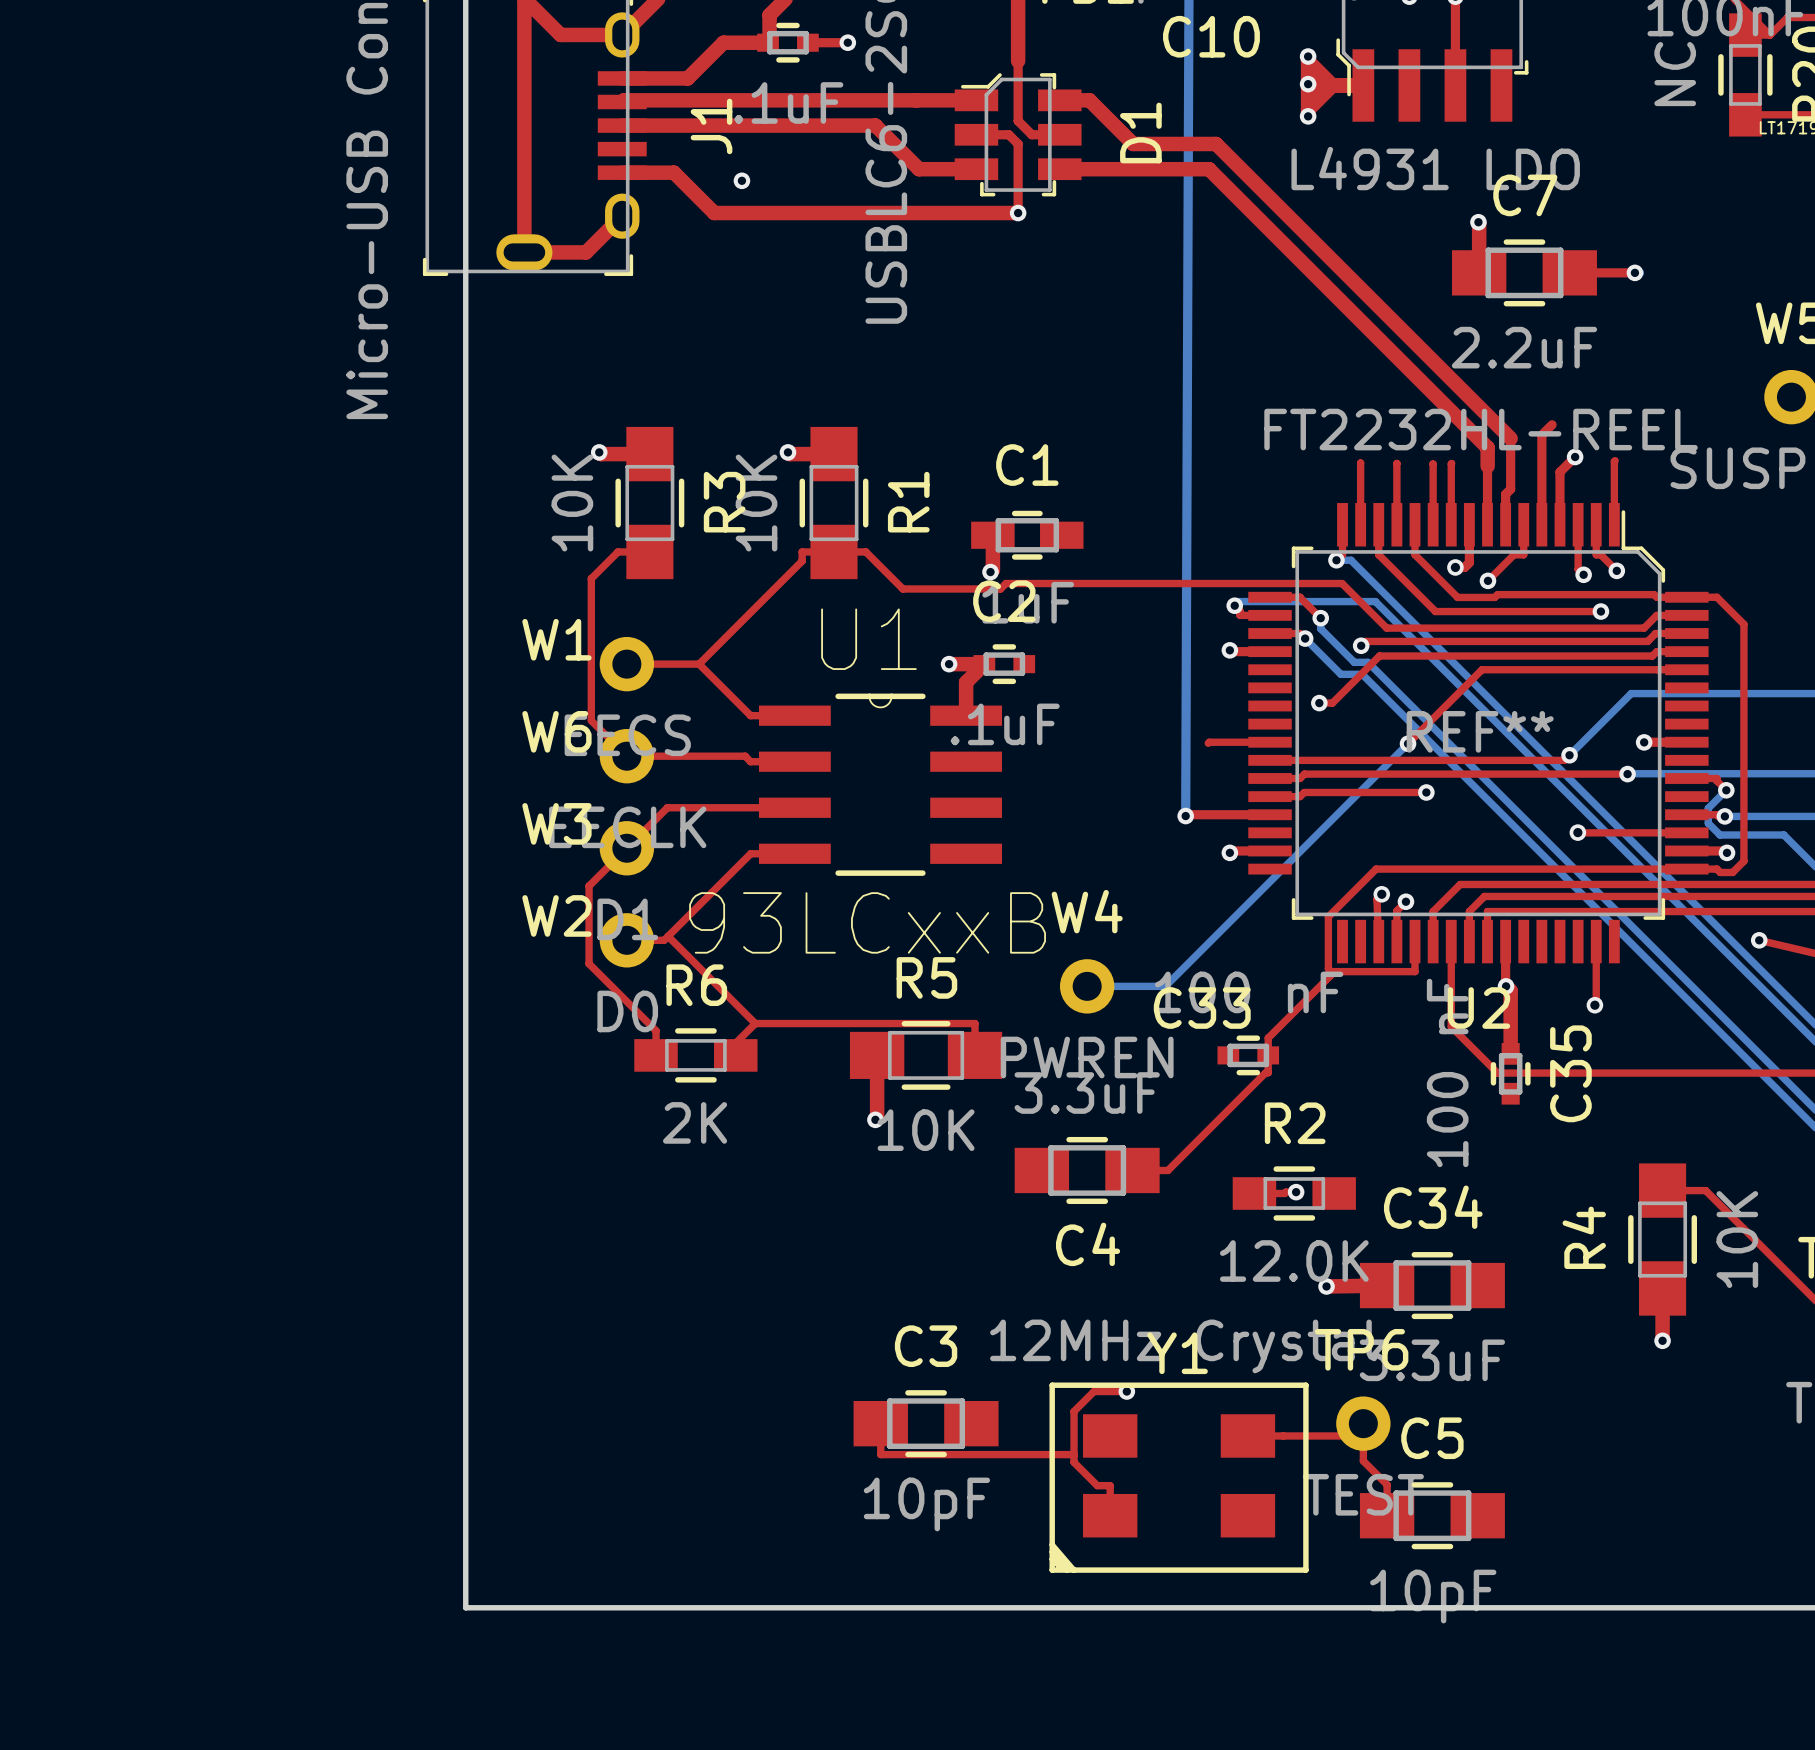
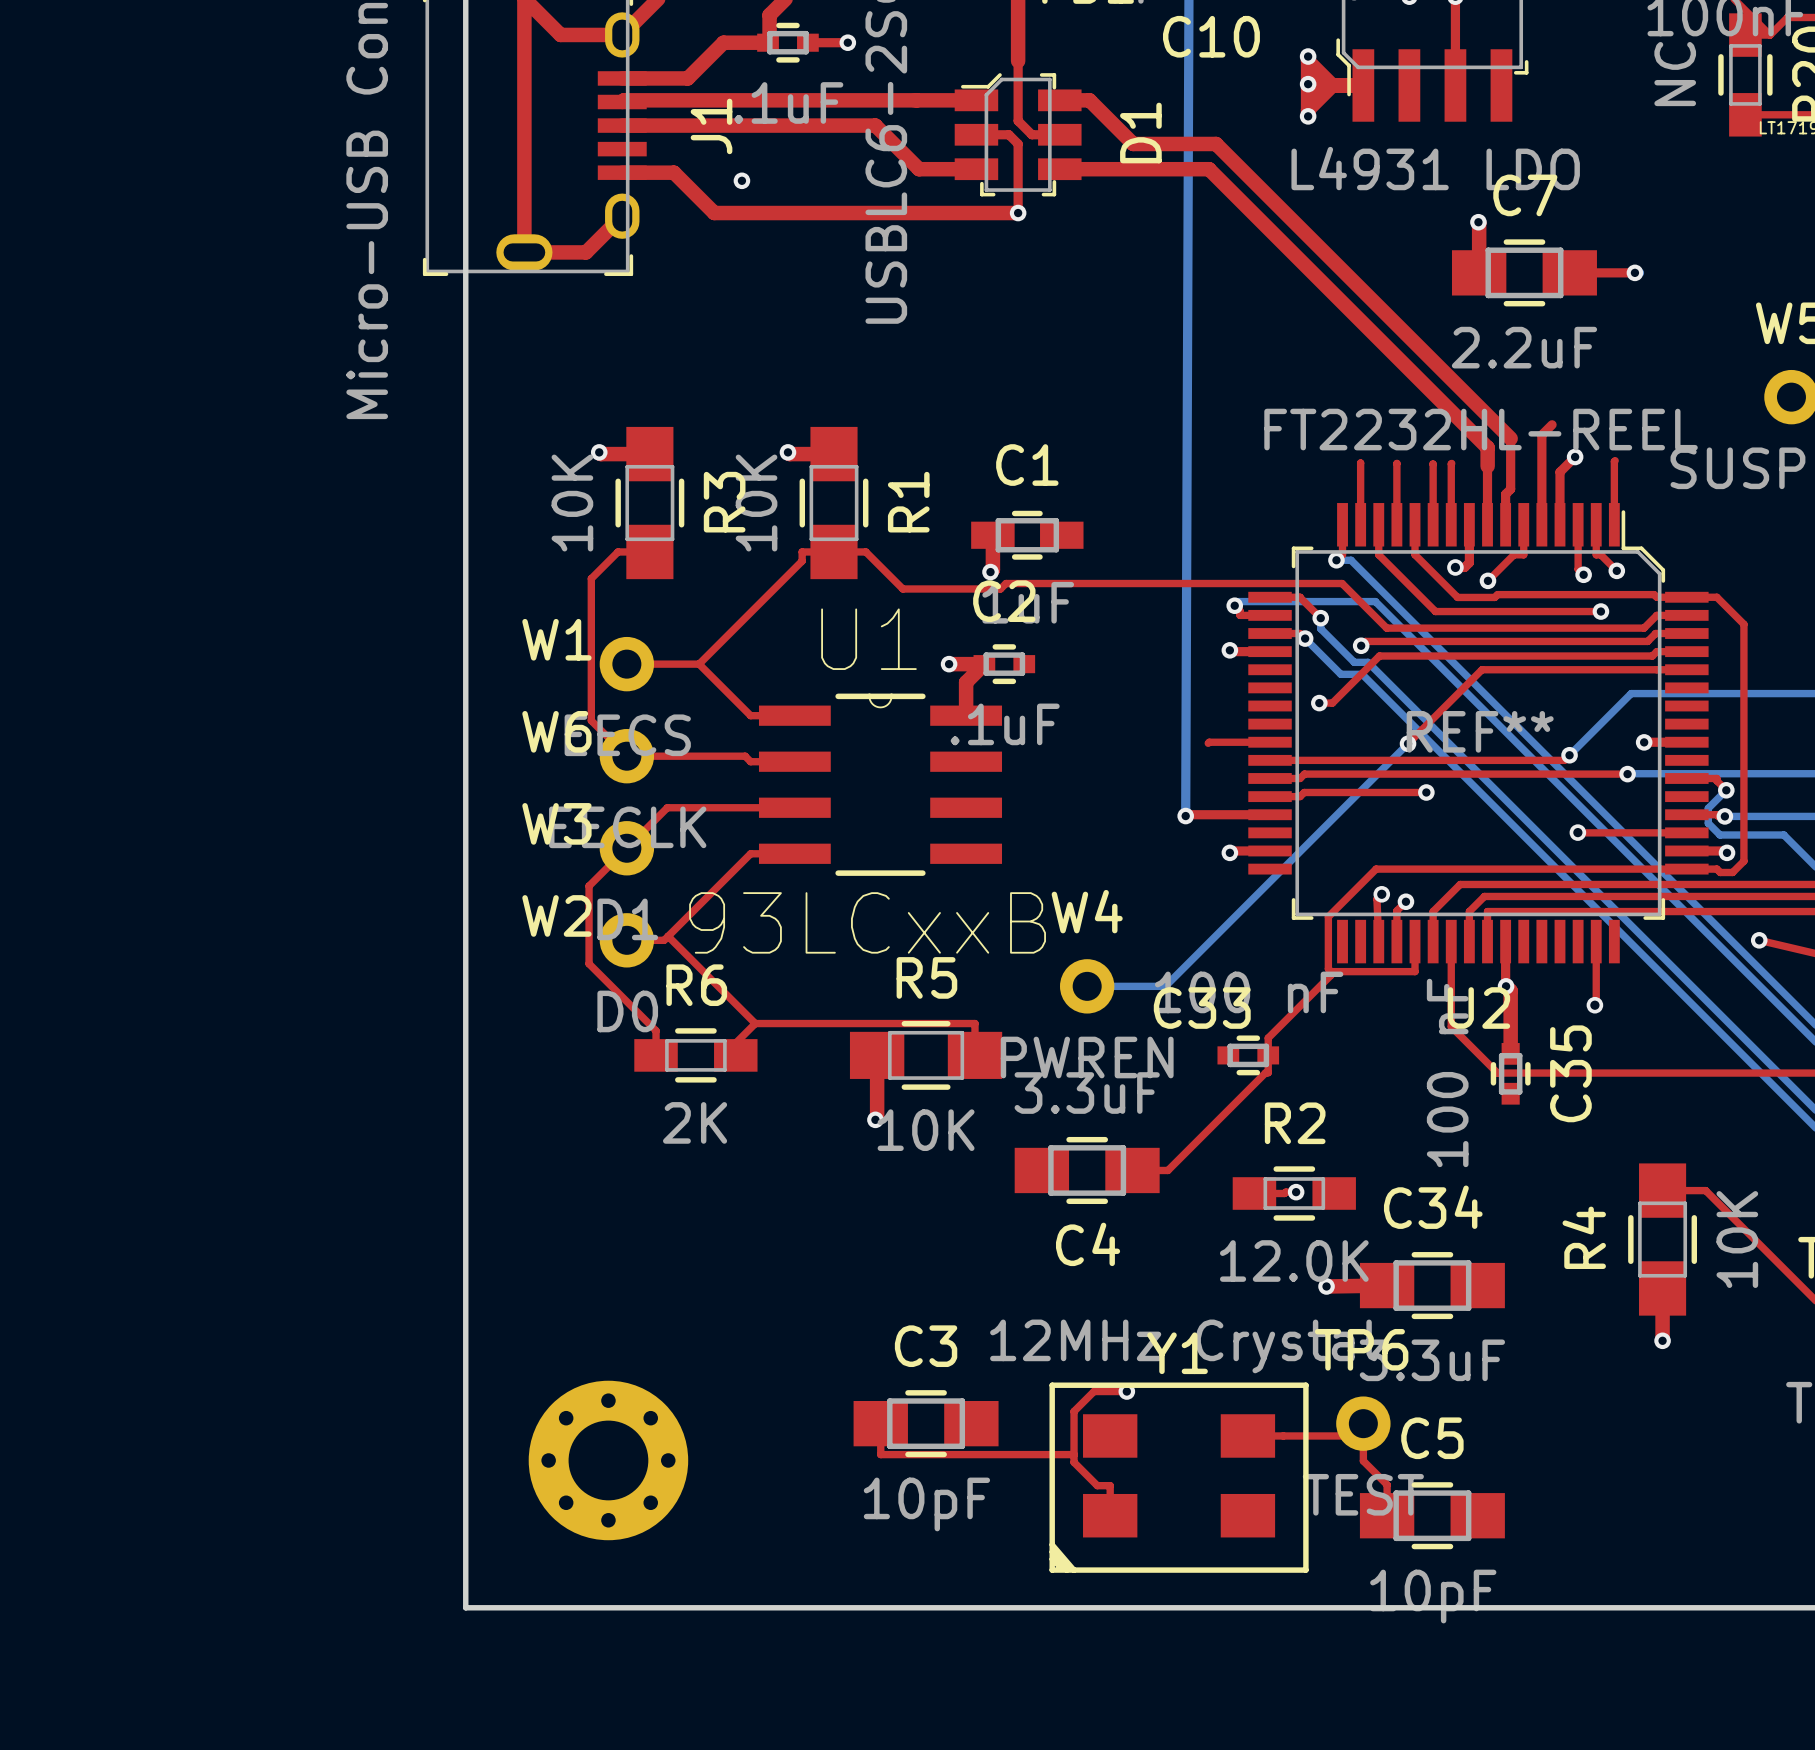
part: none -> (608, 1460)

